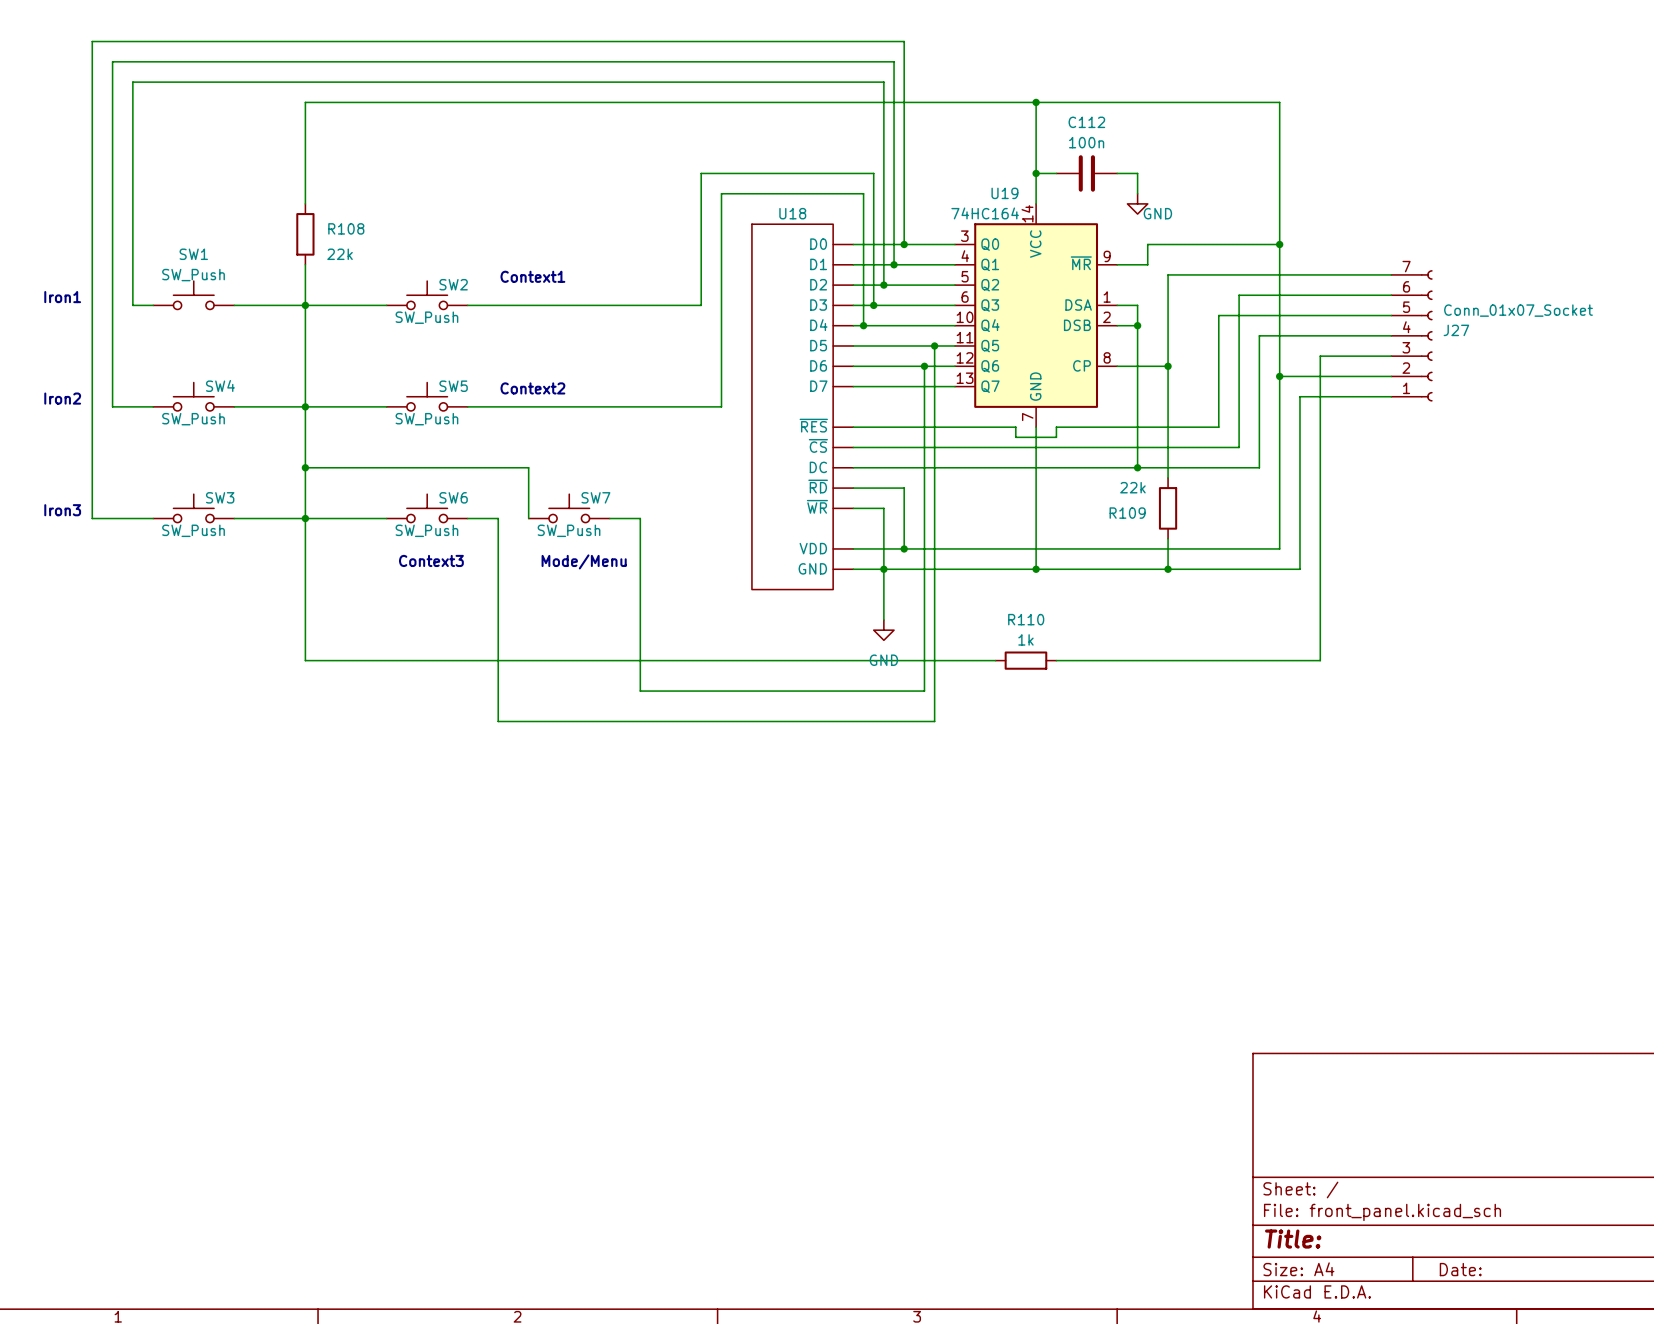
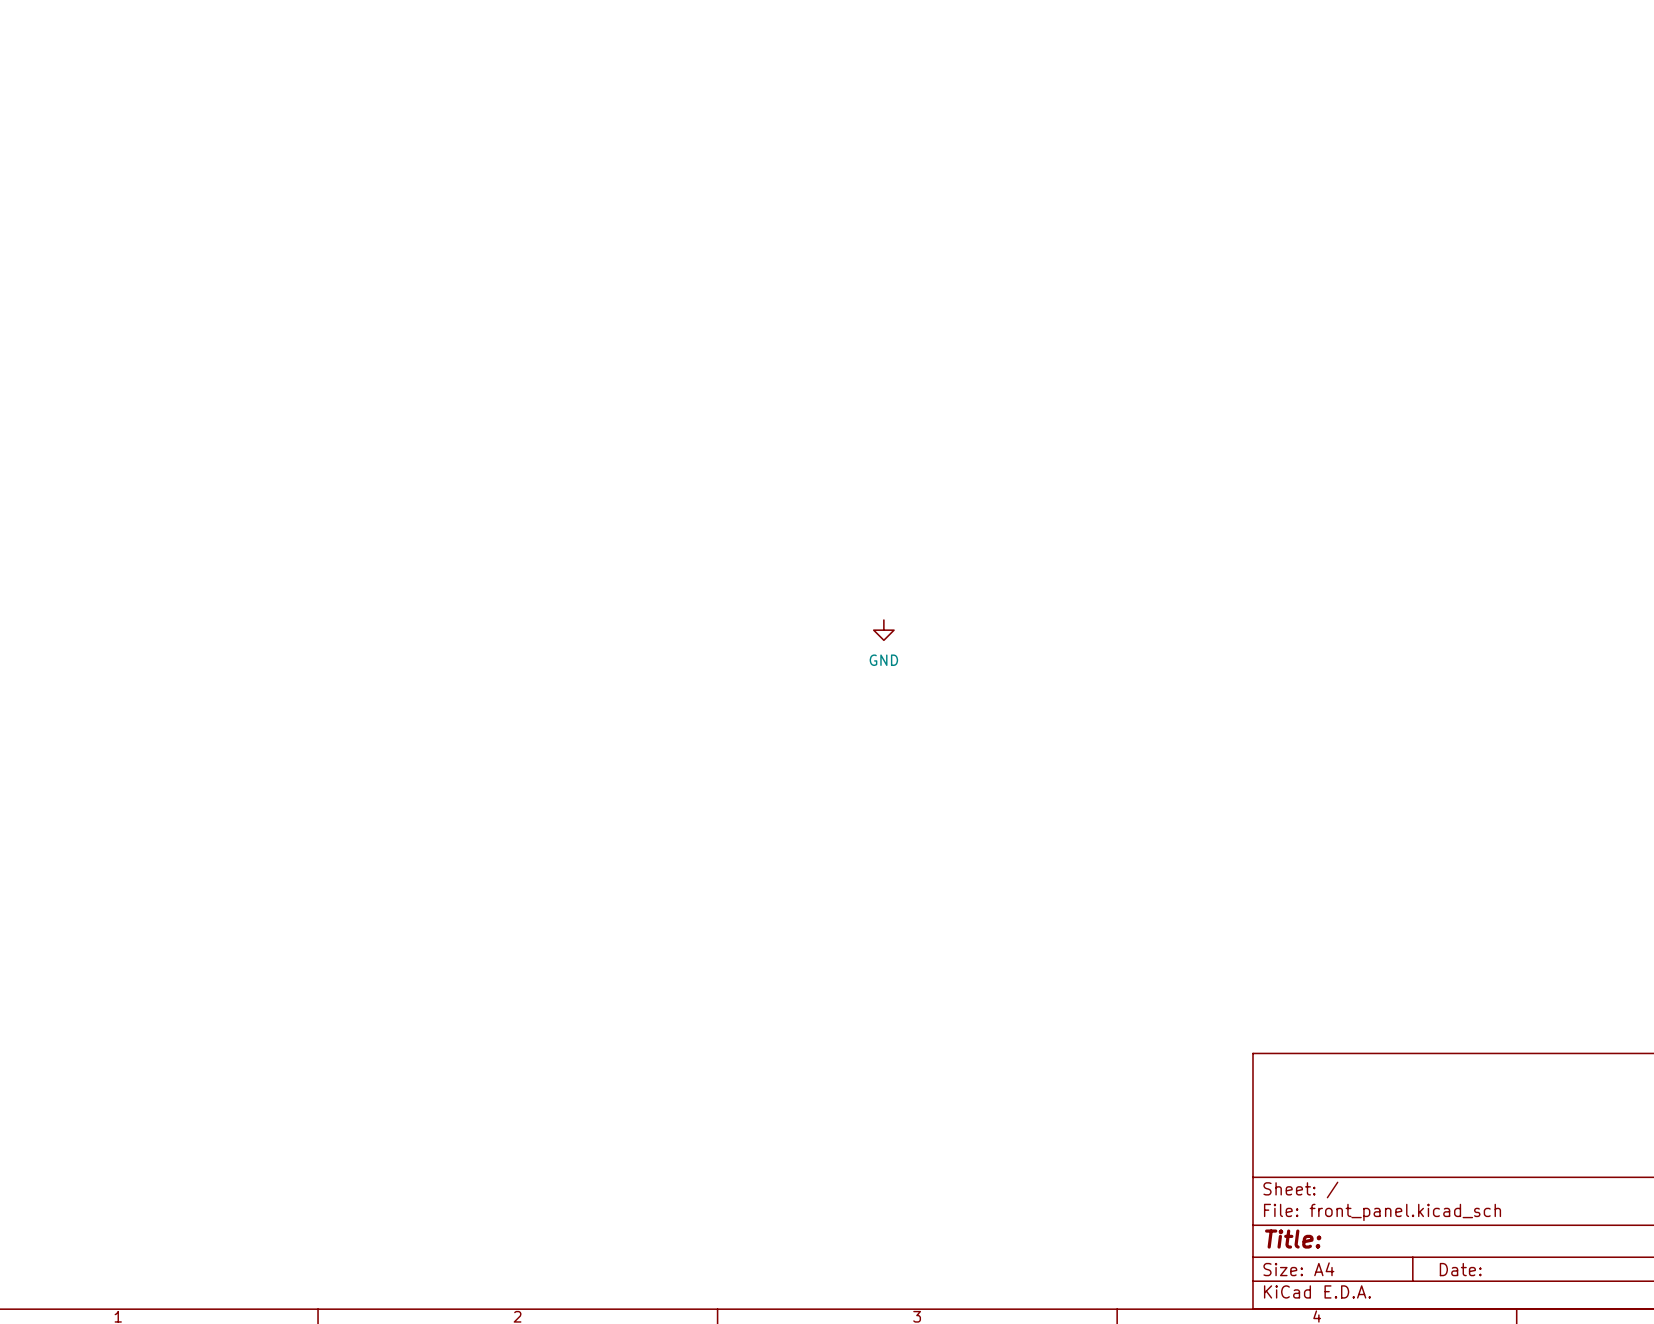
wire: (1036, 102) (1036, 203) -> none
junction: (1036, 102) -> none
wire: (1036, 173) (1056, 173) -> none
junction: (1036, 173) -> none
C112: 100n (1086, 173) -> none
wire: (1117, 173) (1137, 173) (1137, 193) -> none
wire: (305, 203) (305, 102) (1279, 102) (1279, 548) (853, 548) -> none
power symbol: GND (1137, 203) -> none
R108: (305, 234) -> none
wire: (853, 244) (954, 244) -> none
wire: (904, 244) (904, 41) (92, 41) (92, 518) (153, 518) -> none
junction: (904, 244) -> none
wire: (1279, 244) (1147, 244) (1147, 264) (1117, 264) -> none
junction: (1279, 244) -> none
wire: (305, 264) (305, 660) (995, 660) -> none
wire: (853, 264) (954, 264) -> none
wire: (894, 264) (894, 61) (112, 61) (112, 406) (153, 406) -> none
junction: (894, 264) -> none
wire: (1391, 274) (1168, 274) (1168, 477) -> none
text: Context1 (532, 276) -> none
wire: (853, 285) (954, 285) -> none
wire: (883, 285) (883, 82) (132, 82) (132, 305) (153, 305) -> none
junction: (883, 285) -> none
SW1: SW_Push (193, 295) -> none
SW2: SW_Push (427, 295) -> none
wire: (1391, 295) (1239, 295) (1239, 447) (853, 447) -> none
text: Iron1 (62, 297) -> none
wire: (234, 305) (386, 305) -> none
junction: (305, 305) -> none
wire: (467, 305) (701, 305) (701, 173) (873, 173) (873, 305) -> none
wire: (853, 305) (954, 305) -> none
junction: (873, 305) -> none
wire: (1117, 305) (1137, 305) (1137, 467) -> none
U19: 74HC164 (1036, 315) -> none
wire: (1391, 315) (1218, 315) (1218, 427) (1056, 427) (1056, 437) (1015, 437) (1015, 427) (853, 427) -> none
wire: (853, 325) (954, 325) -> none
wire: (863, 325) (863, 193) (721, 193) (721, 406) (467, 406) -> none
junction: (863, 325) -> none
wire: (1117, 325) (1137, 325) -> none
junction: (1137, 325) -> none
wire: (1391, 335) (1259, 335) (1259, 467) (853, 467) -> none
J27: Conn_01x07_Socket (1411, 335) -> none
wire: (853, 345) (954, 345) -> none
wire: (934, 345) (934, 721) (498, 721) (498, 518) (467, 518) -> none
junction: (934, 345) -> none
wire: (1391, 356) (1320, 356) (1320, 660) (1056, 660) -> none
wire: (853, 366) (954, 366) -> none
wire: (924, 366) (924, 691) (640, 691) (640, 518) (609, 518) -> none
junction: (924, 366) -> none
wire: (1117, 366) (1168, 366) -> none
junction: (1168, 366) -> none
wire: (1279, 376) (1391, 376) -> none
junction: (1279, 376) -> none
wire: (853, 386) (954, 386) -> none
text: Context2 (532, 388) -> none
SW4: SW_Push (193, 396) -> none
SW5: SW_Push (427, 396) -> none
wire: (1391, 396) (1299, 396) (1299, 569) (853, 569) -> none
text: Iron2 (62, 398) -> none
wire: (234, 406) (386, 406) -> none
junction: (305, 406) -> none
U18: (802, 406) -> none
wire: (1036, 427) (1036, 569) -> none
wire: (305, 467) (528, 467) (528, 518) -> none
junction: (305, 467) -> none
junction: (1137, 467) -> none
wire: (853, 488) (904, 488) (904, 548) -> none
SW3: SW_Push (193, 508) -> none
SW6: SW_Push (427, 508) -> none
SW7: SW_Push (569, 508) -> none
wire: (853, 508) (883, 508) (883, 620) -> none
R109: (1168, 508) -> none
text: Iron3 (62, 510) -> none
wire: (234, 518) (386, 518) -> none
junction: (305, 518) -> none
wire: (1168, 538) (1168, 569) -> none
junction: (904, 548) -> none
text: Context3 (431, 560) -> none
text: Mode/Menu (584, 561) -> none
junction: (883, 569) -> none
junction: (1036, 569) -> none
junction: (1168, 569) -> none
R110: 1k (1025, 660) -> none

